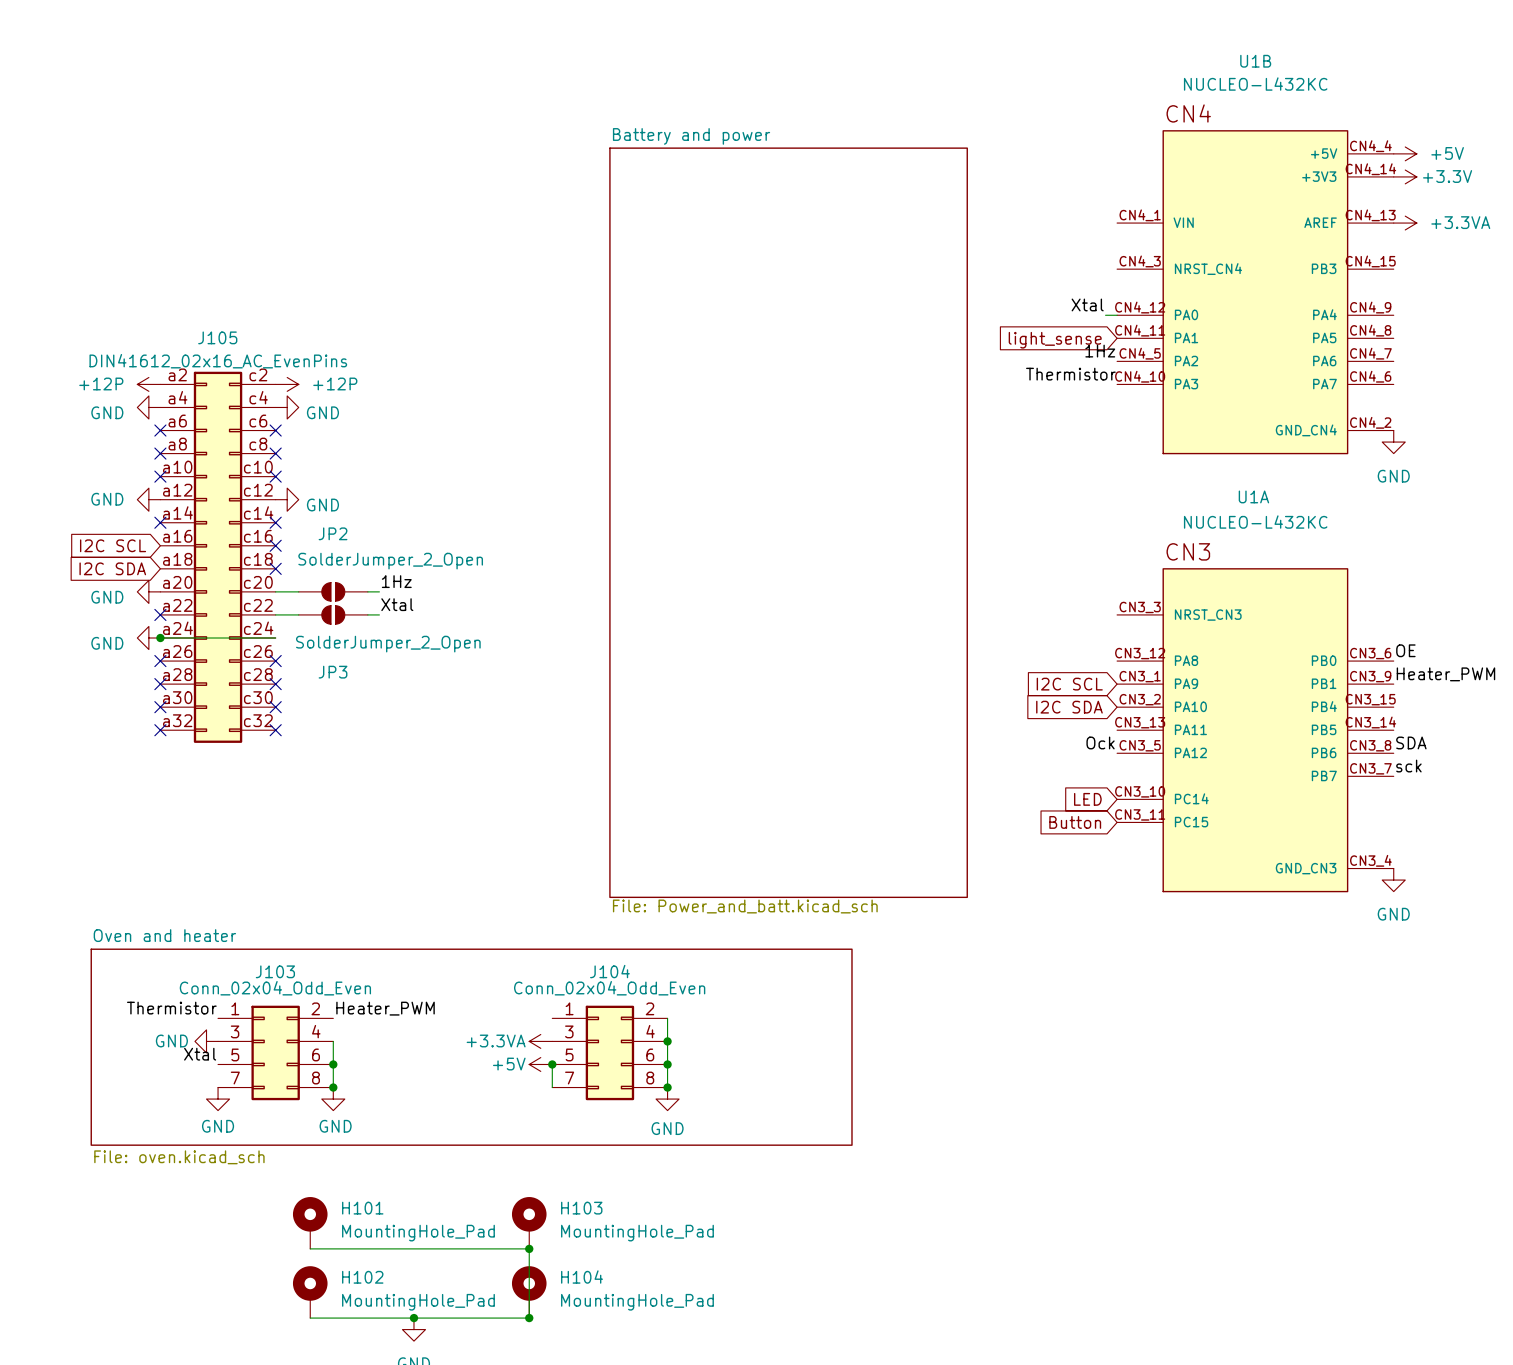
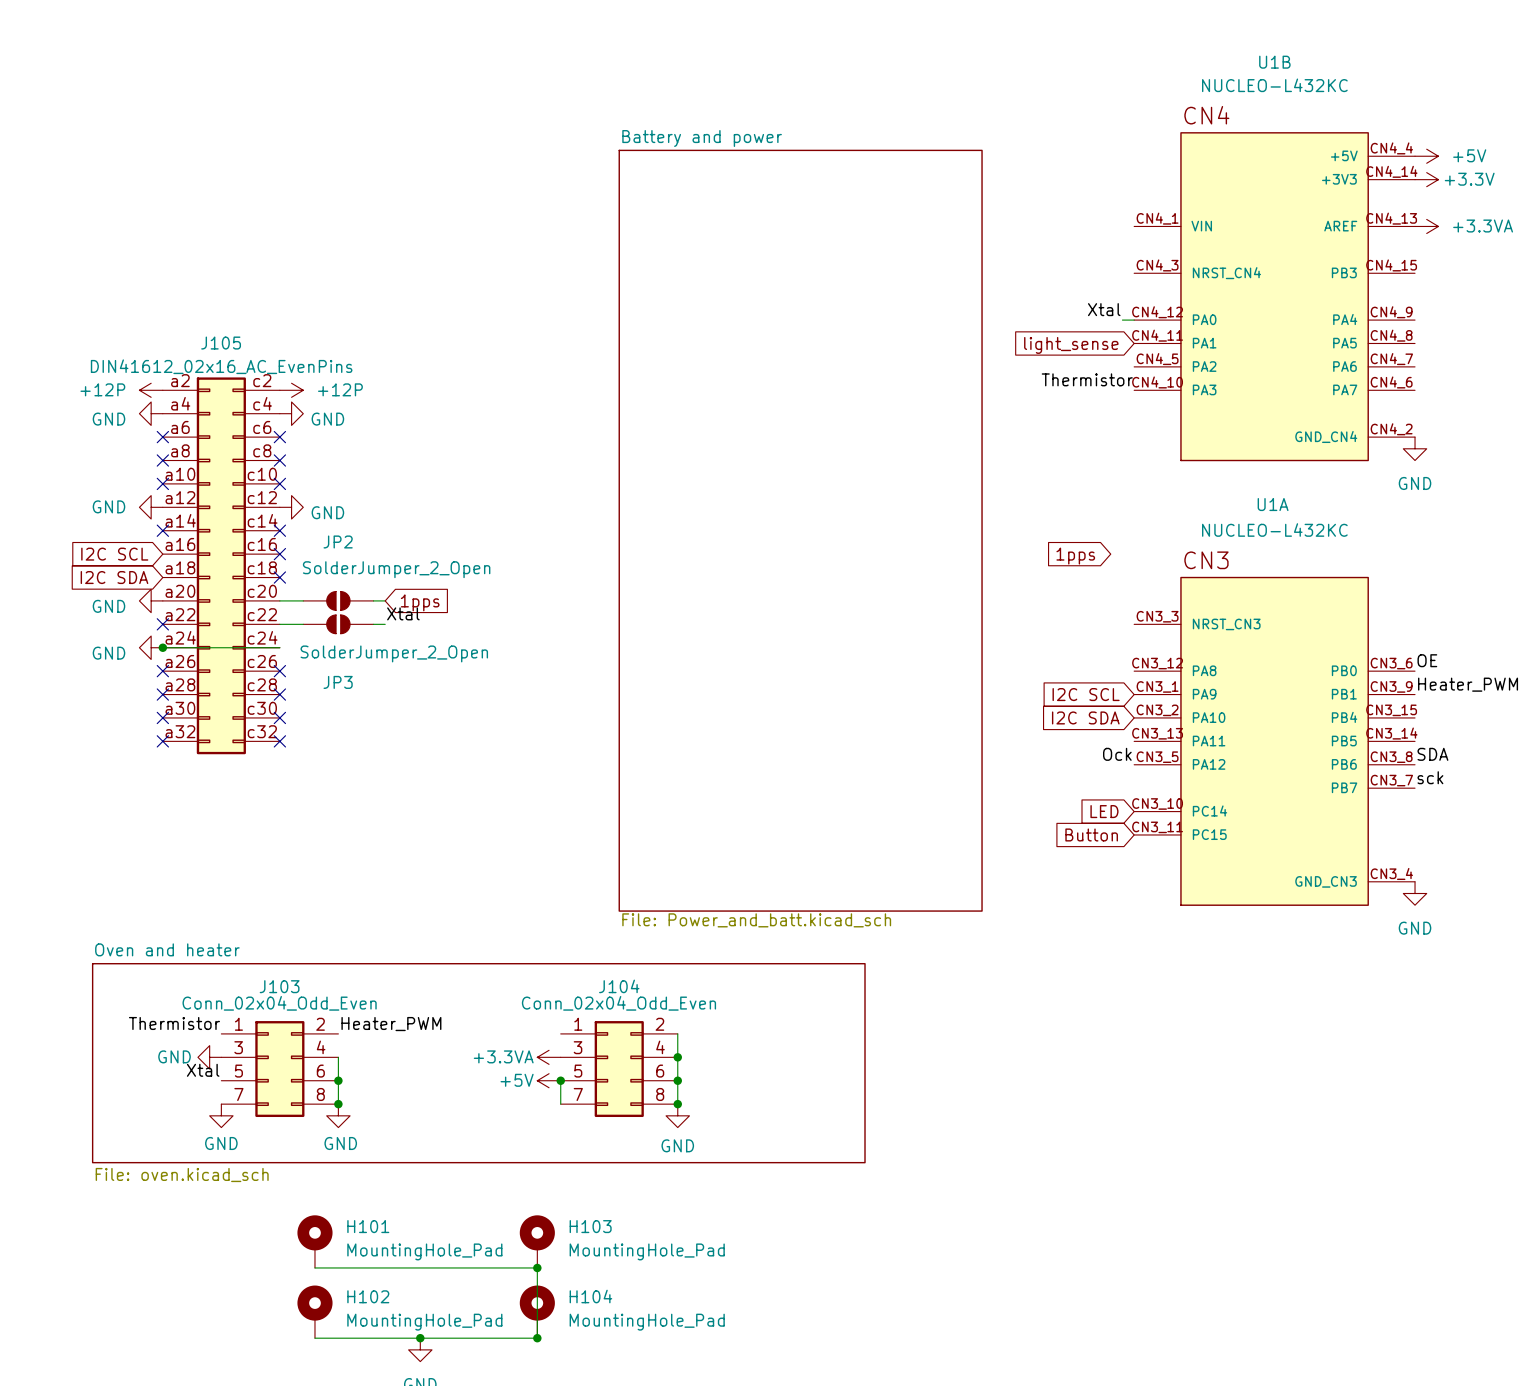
label: 1Hz (1100, 351) -> none
global label: none -> 1pps (1075, 556)
label: 1Hz (396, 581) -> none
global label: none -> 1pps (420, 602)

